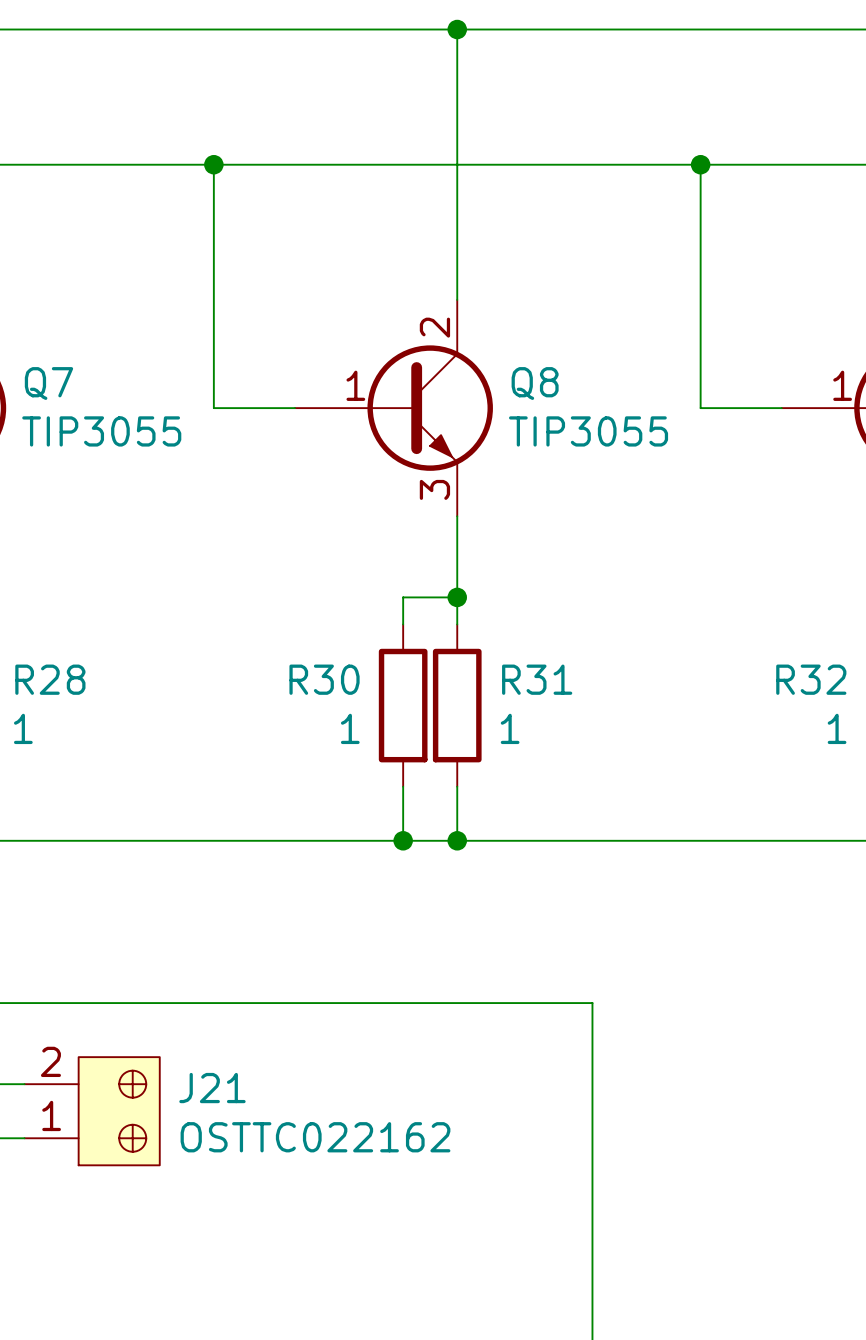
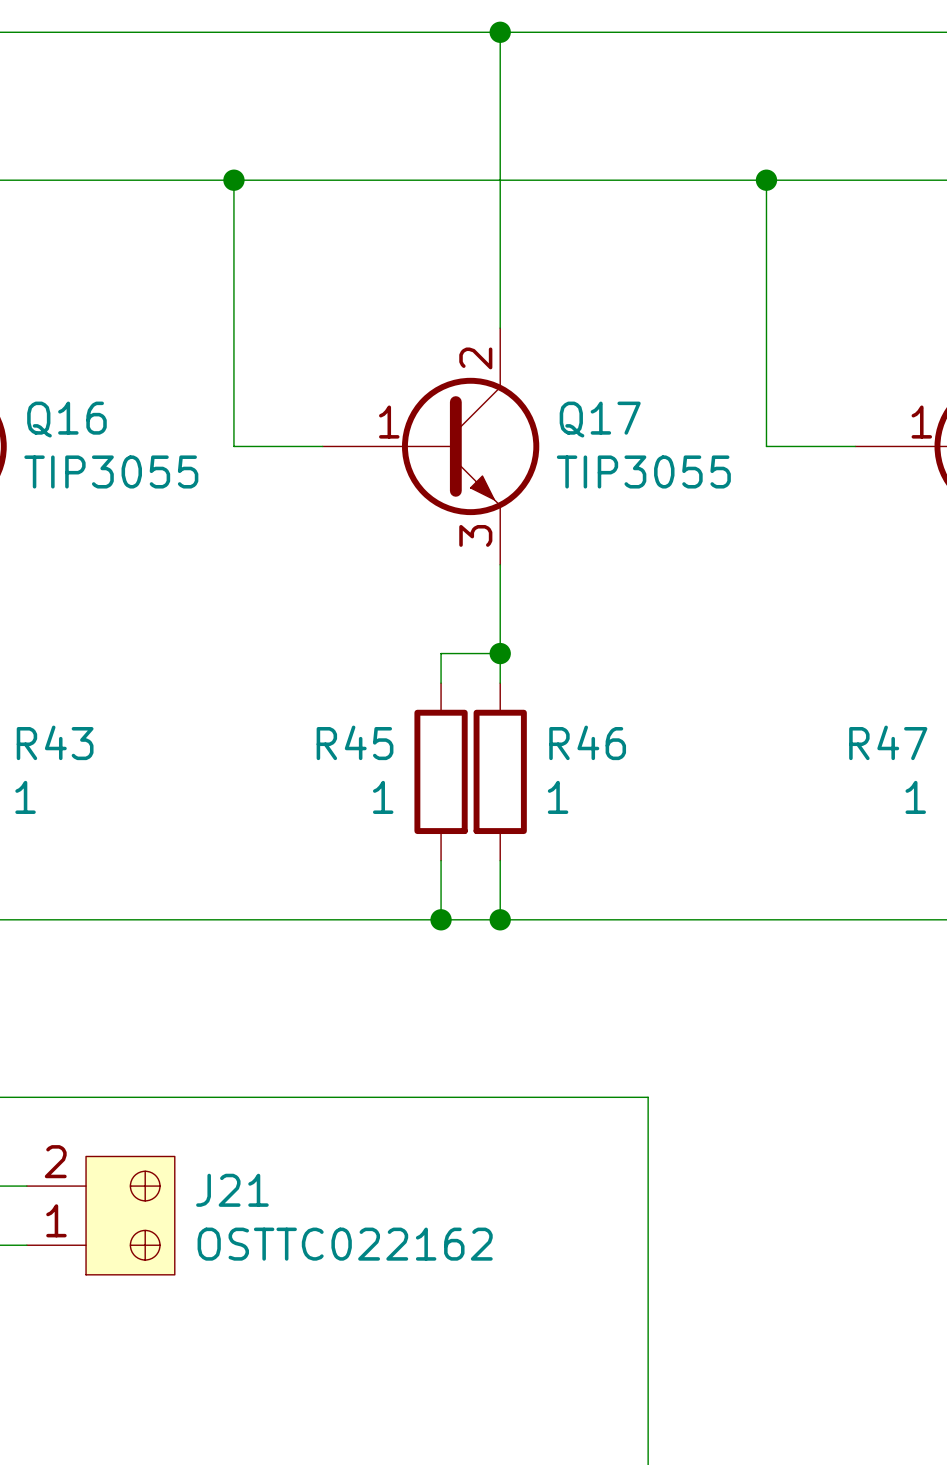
Q7 name: Q7 (48, 383) -> Q16 (66, 419)
Q8 name: Q8 (535, 383) -> Q17 (600, 419)
R28 name: R28 (50, 679) -> R43 (55, 742)
R30 name: R30 (324, 679) -> R45 (355, 742)
R31 name: R31 (537, 679) -> R46 (587, 742)
R32 name: R32 (811, 679) -> R47 (888, 742)

